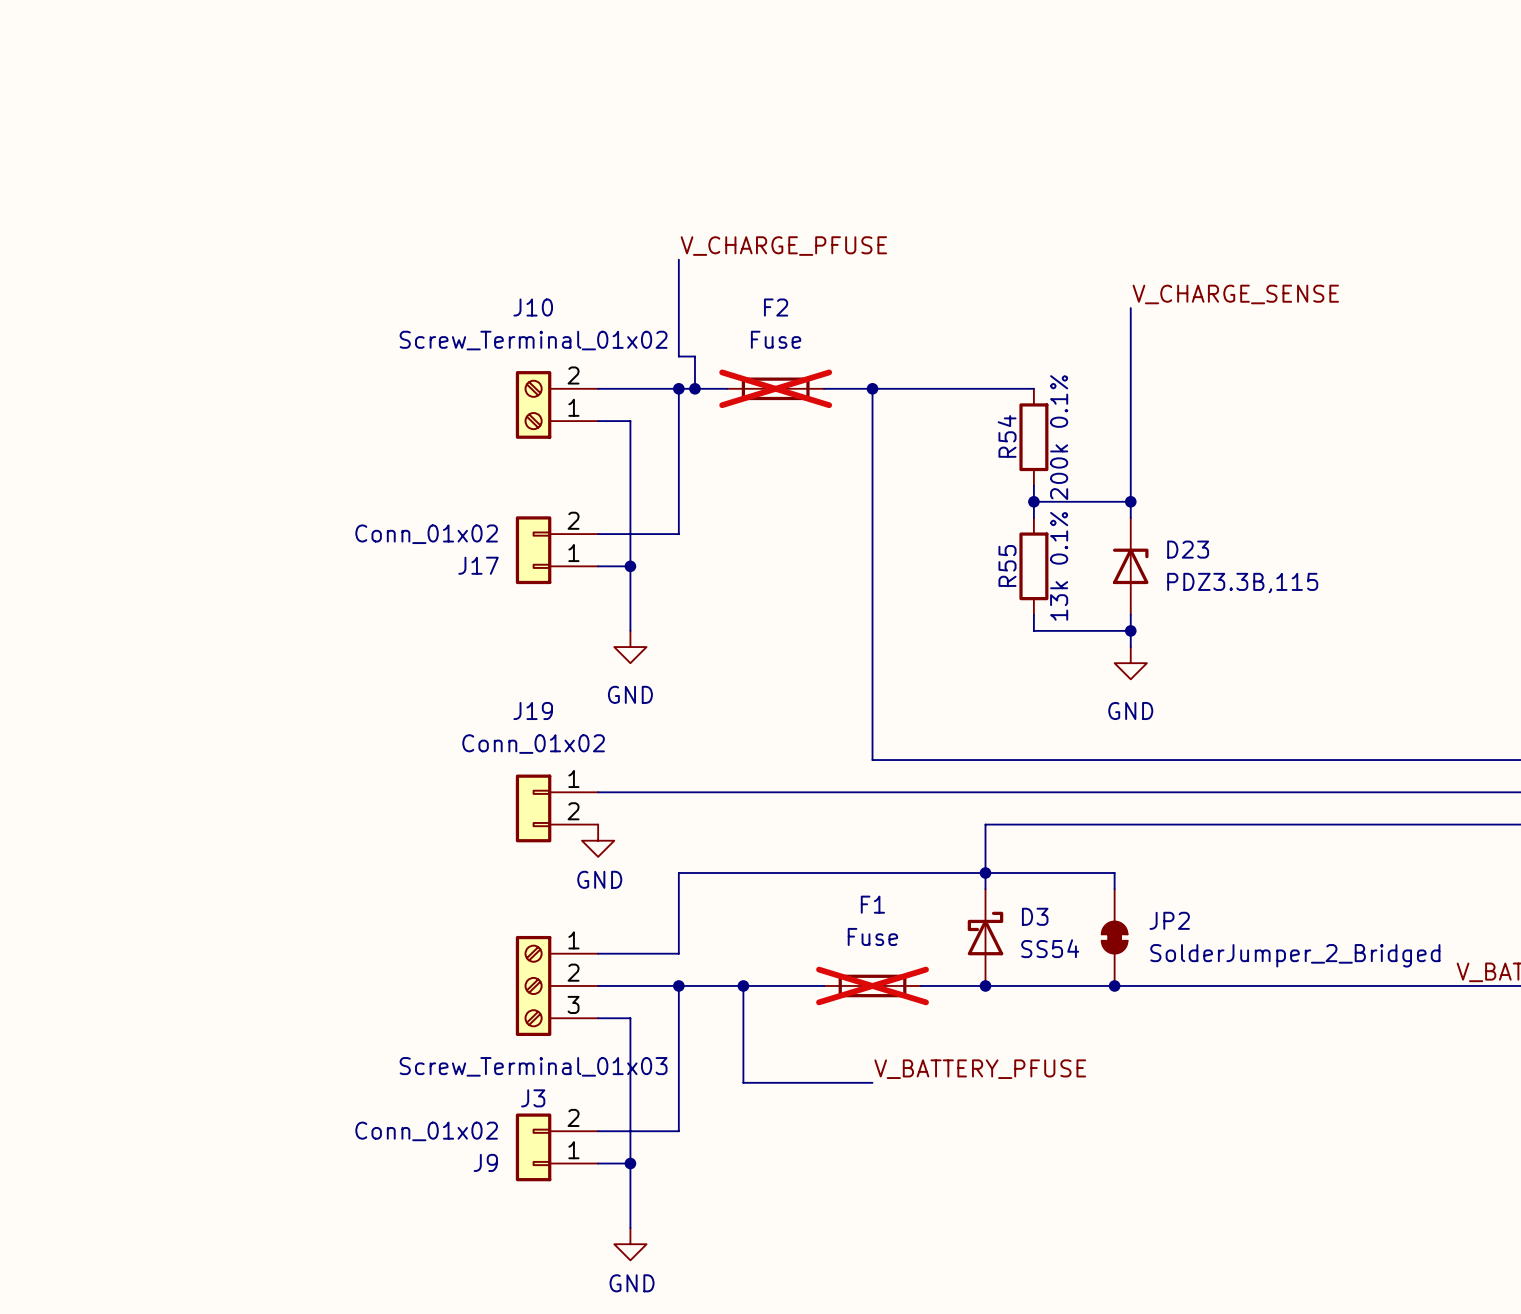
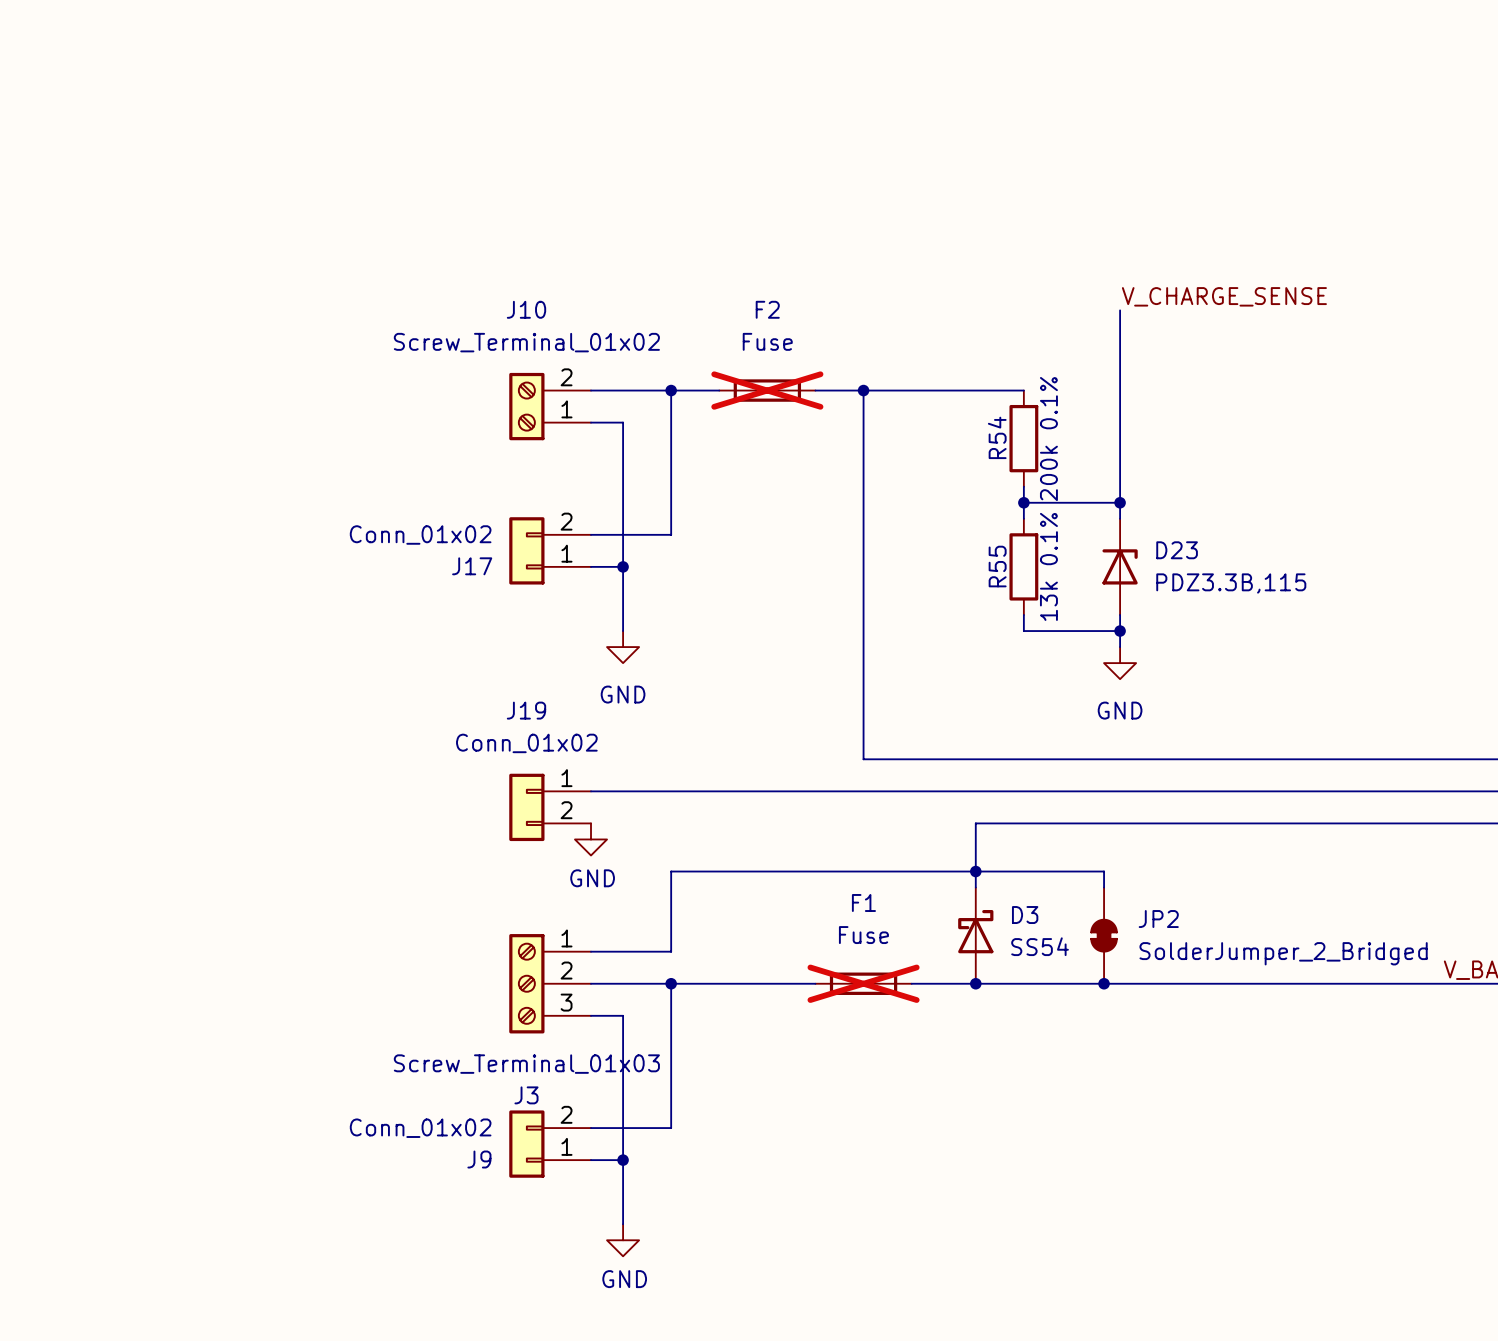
label: V_CHARGE_PFUSE (783, 246) -> none
wire: (678, 259) (678, 356) (694, 356) (694, 388) -> none
junction: (694, 388) -> none
wire: (743, 985) (743, 1082) (872, 1082) -> none
junction: (743, 985) -> none
label: V_BATTERY_PFUSE (980, 1069) -> none

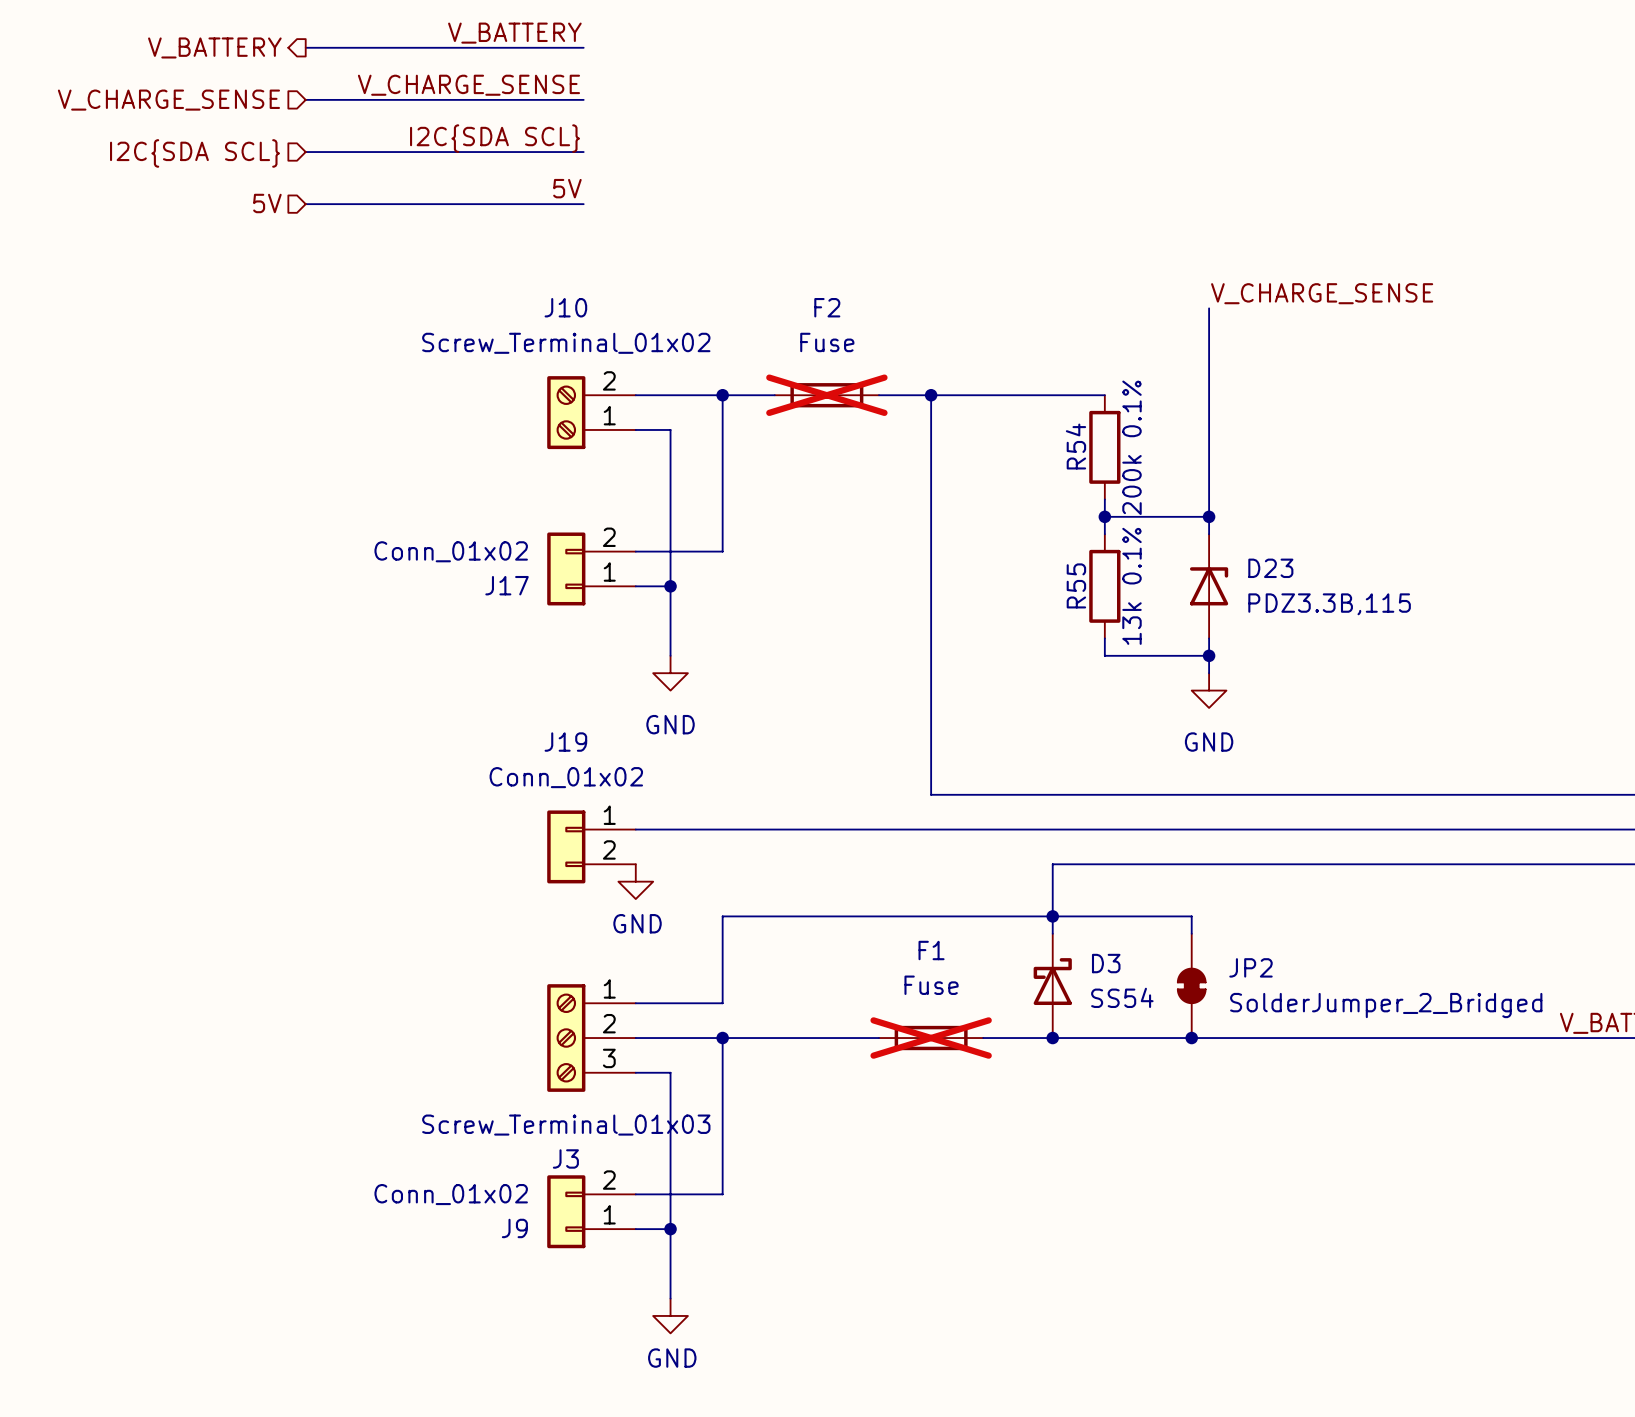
label: none -> V_BATTERY (514, 33)
wire: none -> (305, 47) (583, 47)
hierarchical label: none -> V_BATTERY (214, 47)
label: none -> V_CHARGE_SENSE (468, 85)
wire: none -> (305, 99) (583, 99)
hierarchical label: none -> V_CHARGE_SENSE (168, 100)
label: none -> I2C{SDA SCL} (495, 138)
bus: none -> (305, 152) (583, 152)
hierarchical label: none -> I2C{SDA SCL} (195, 153)
label: none -> 5V (567, 188)
hierarchical label: none -> 5V (267, 203)
wire: none -> (305, 204) (583, 204)

